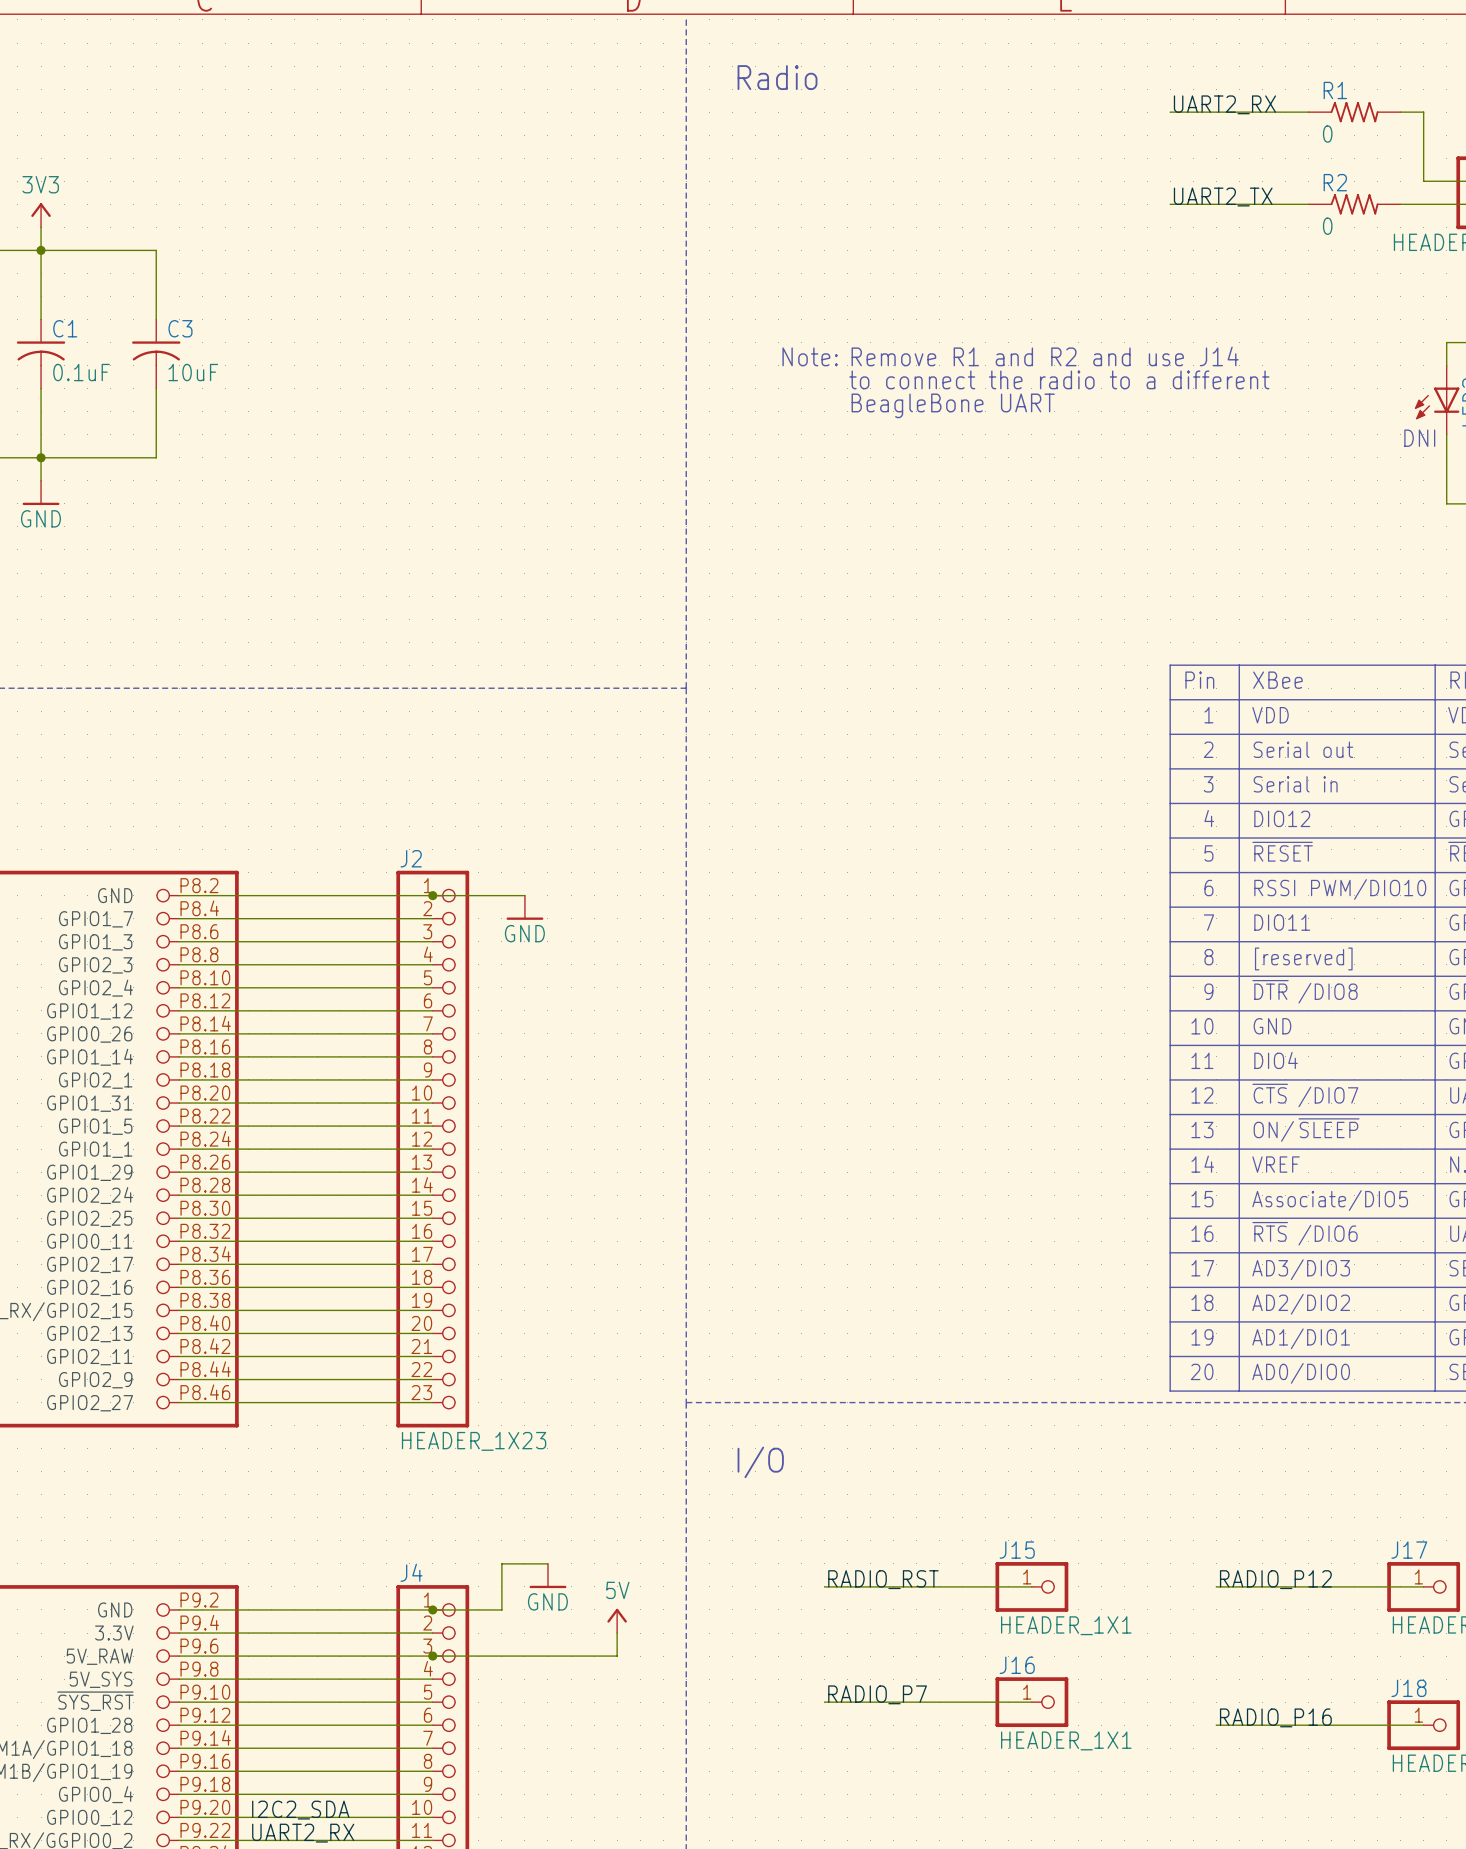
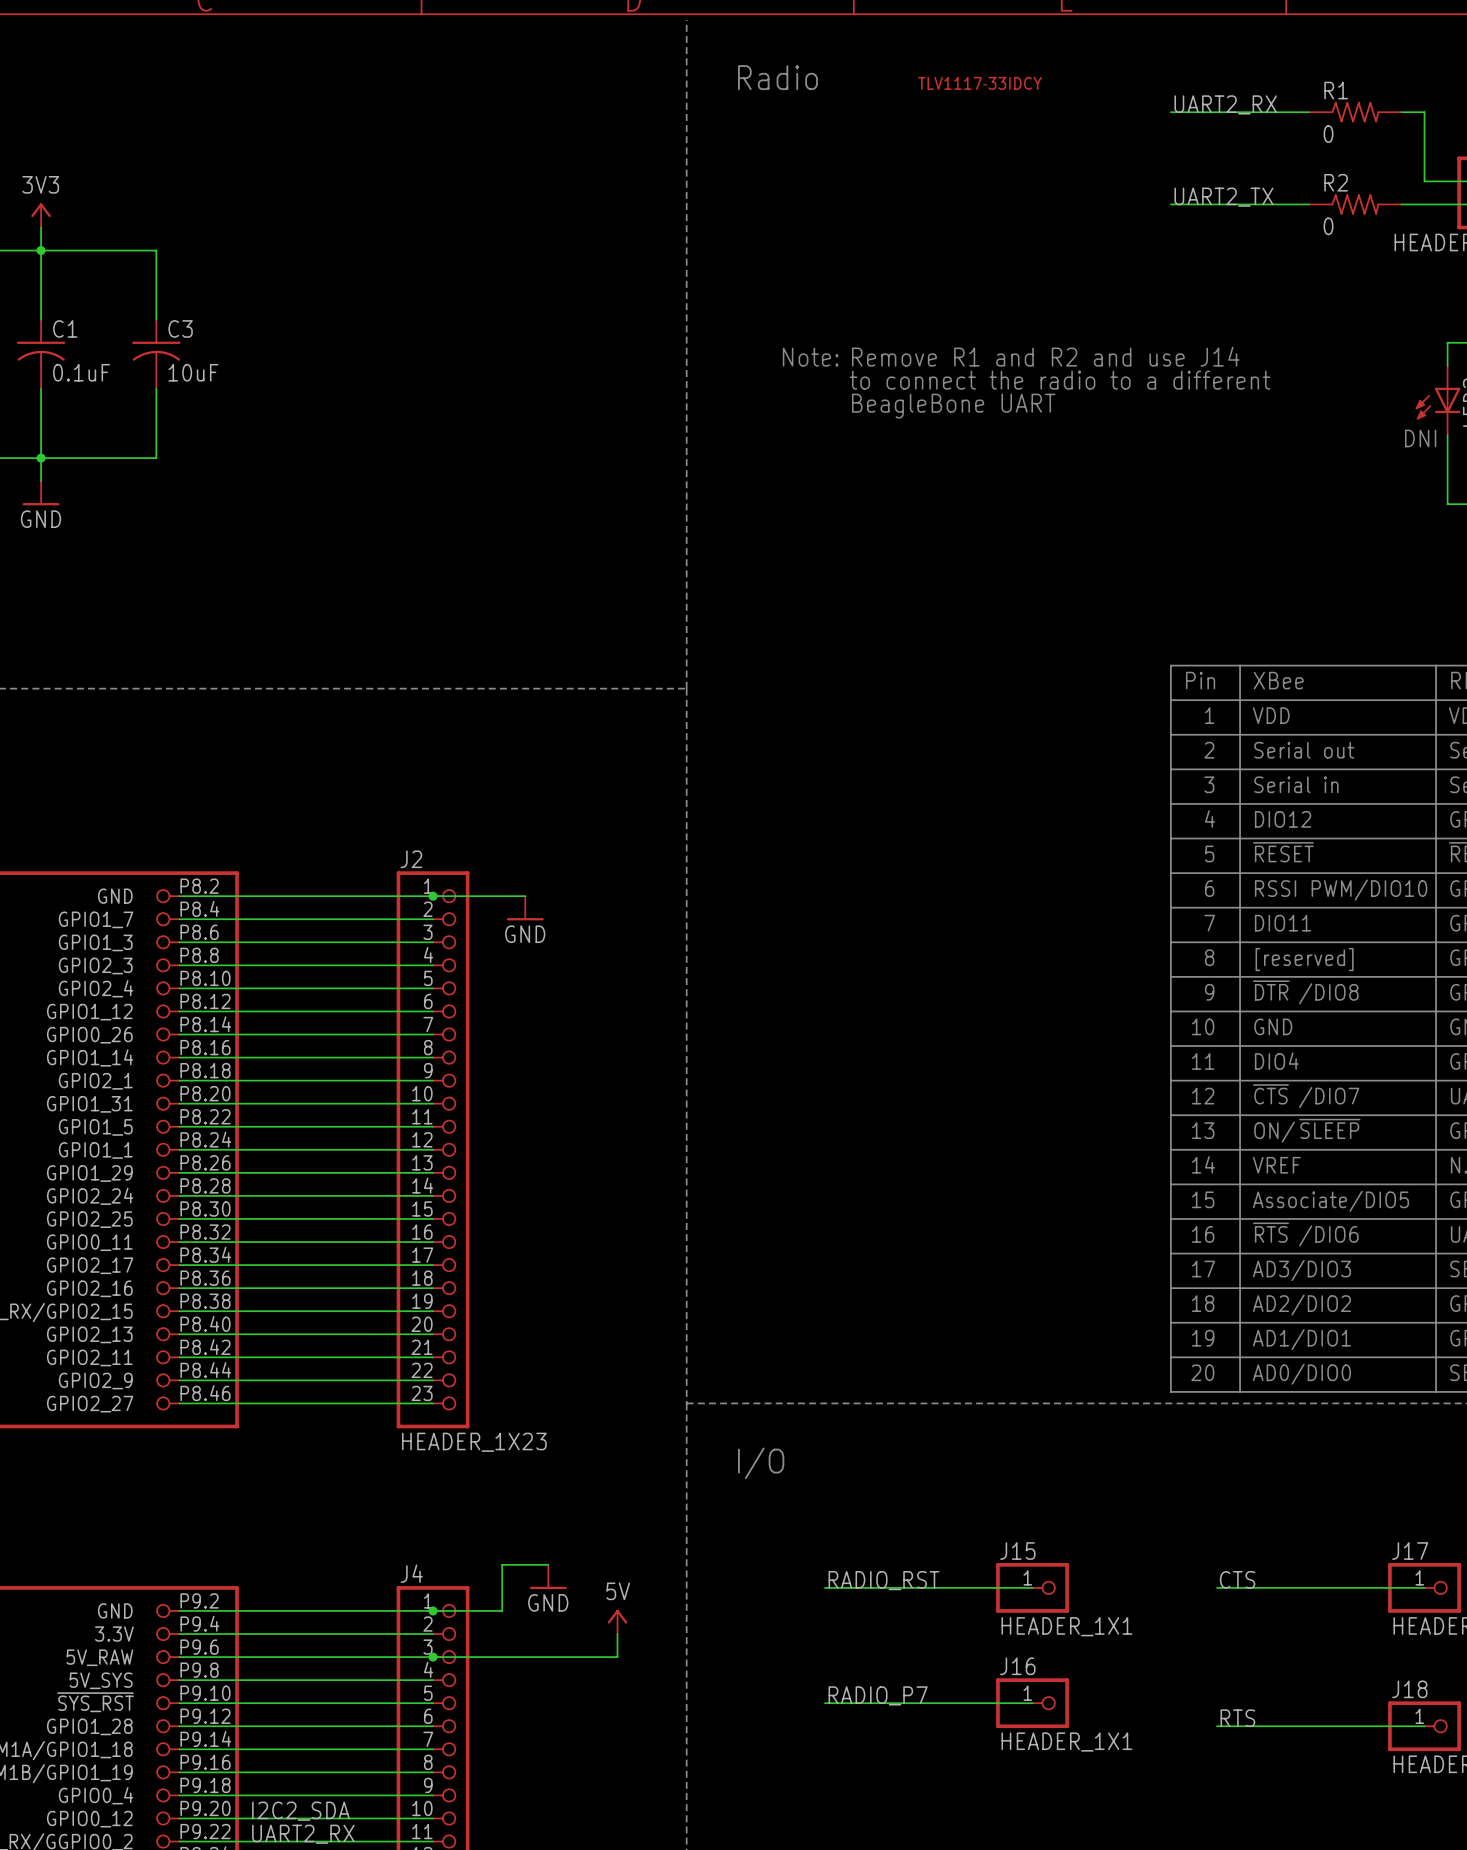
text: none -> TLV1117‑33IDCY (979, 83)
label: RADIO_P12 (1275, 1579) -> CTS (1237, 1579)
label: RADIO_P16 (1275, 1717) -> RTS (1237, 1718)

